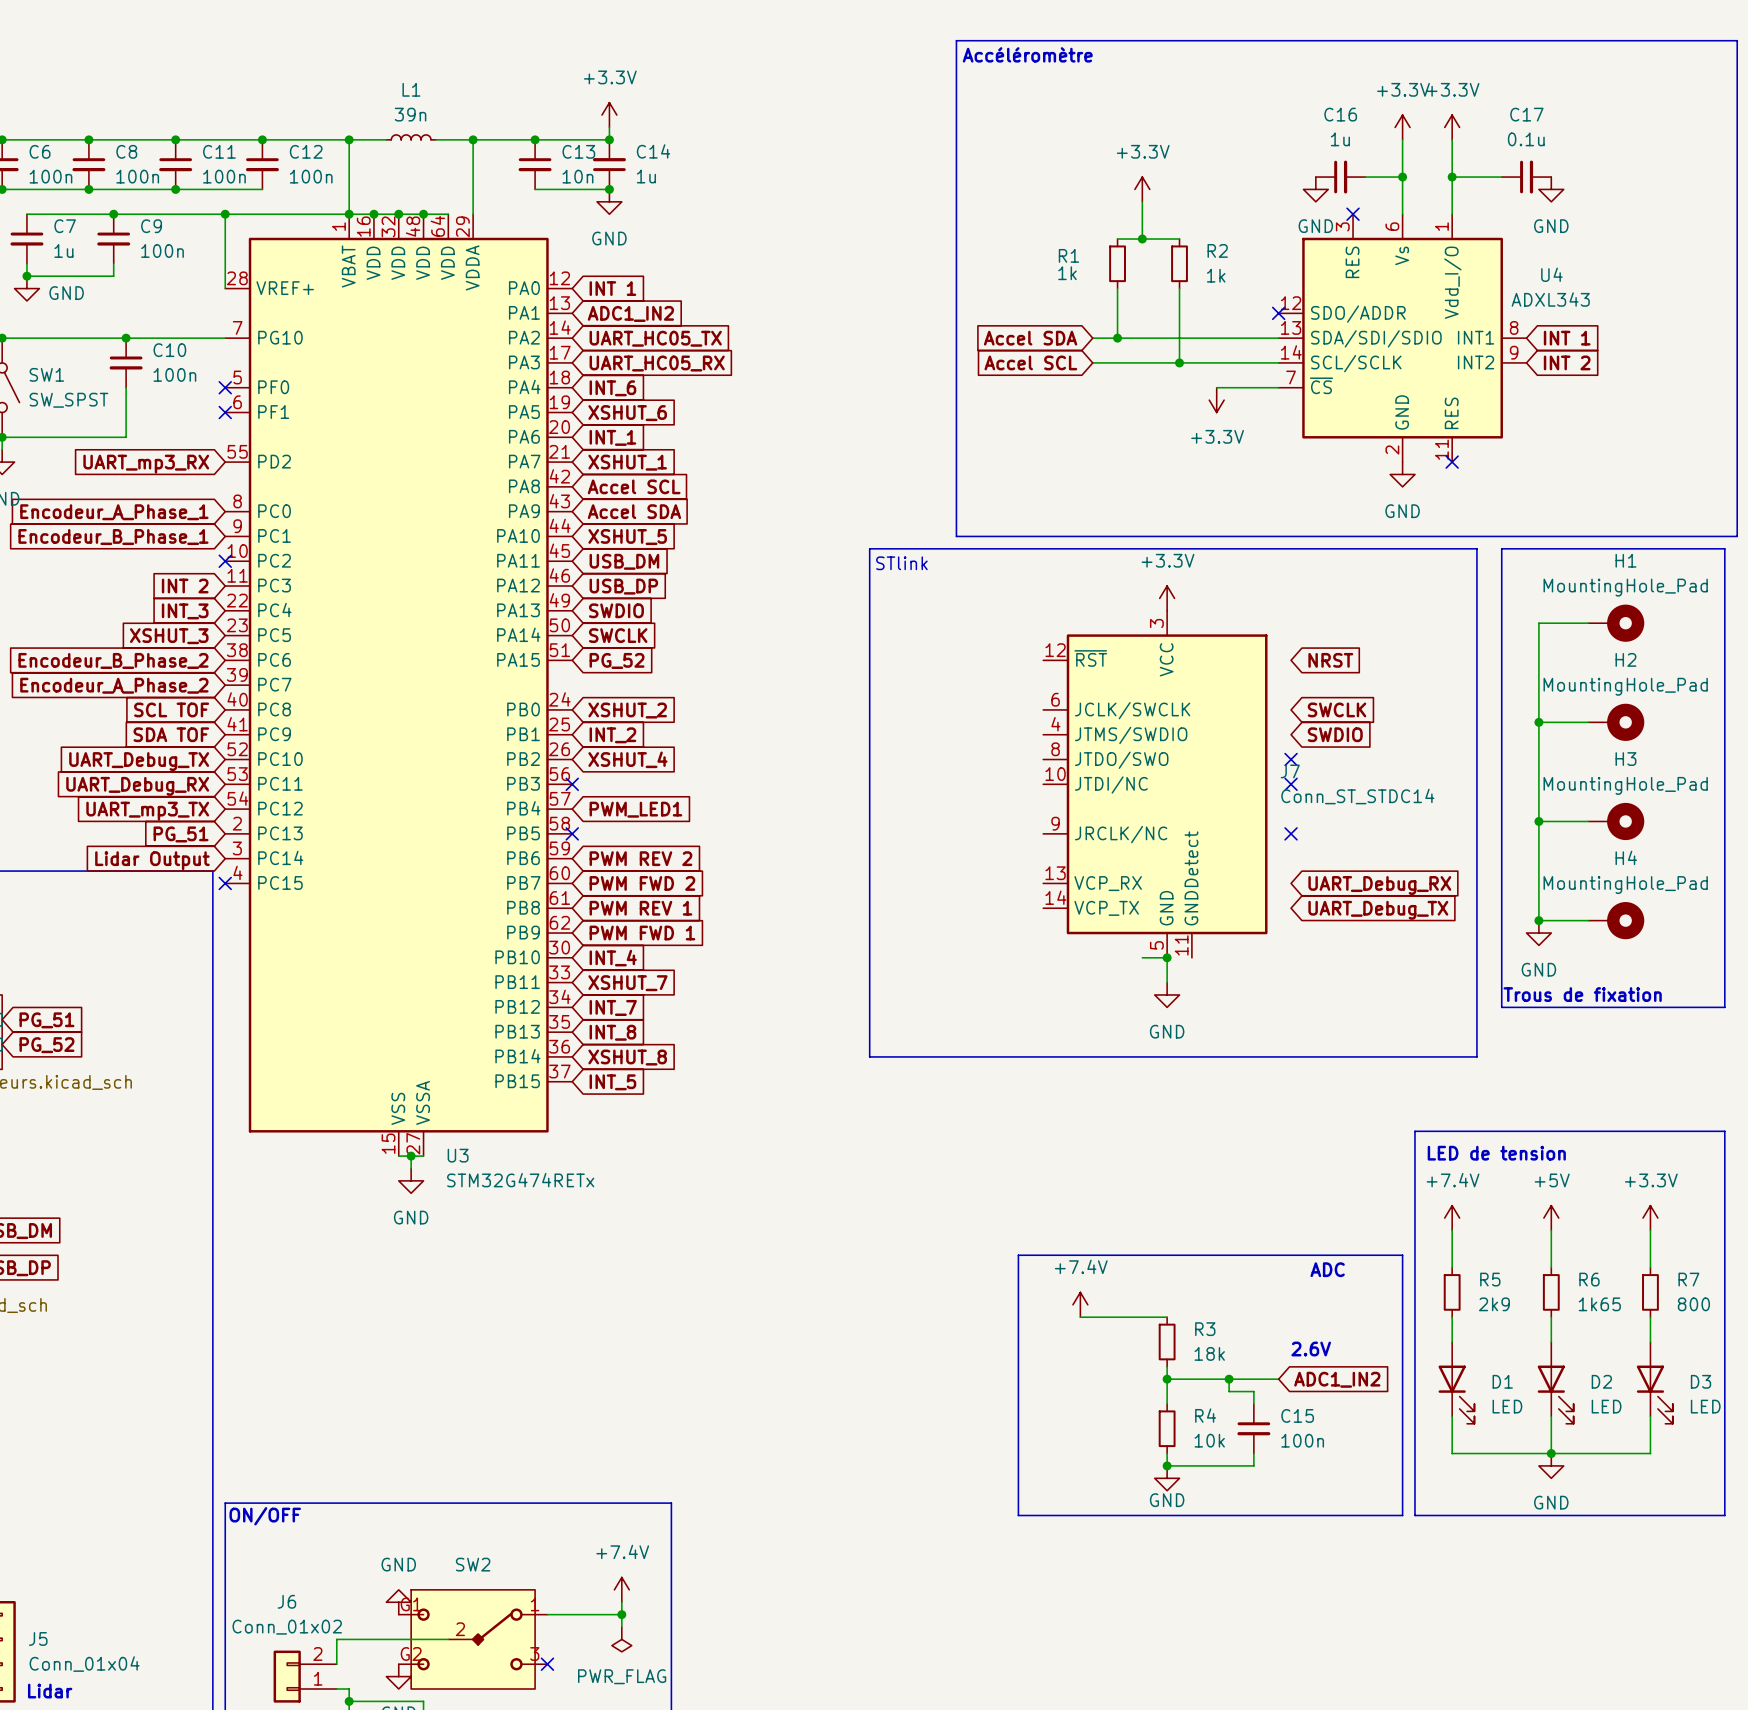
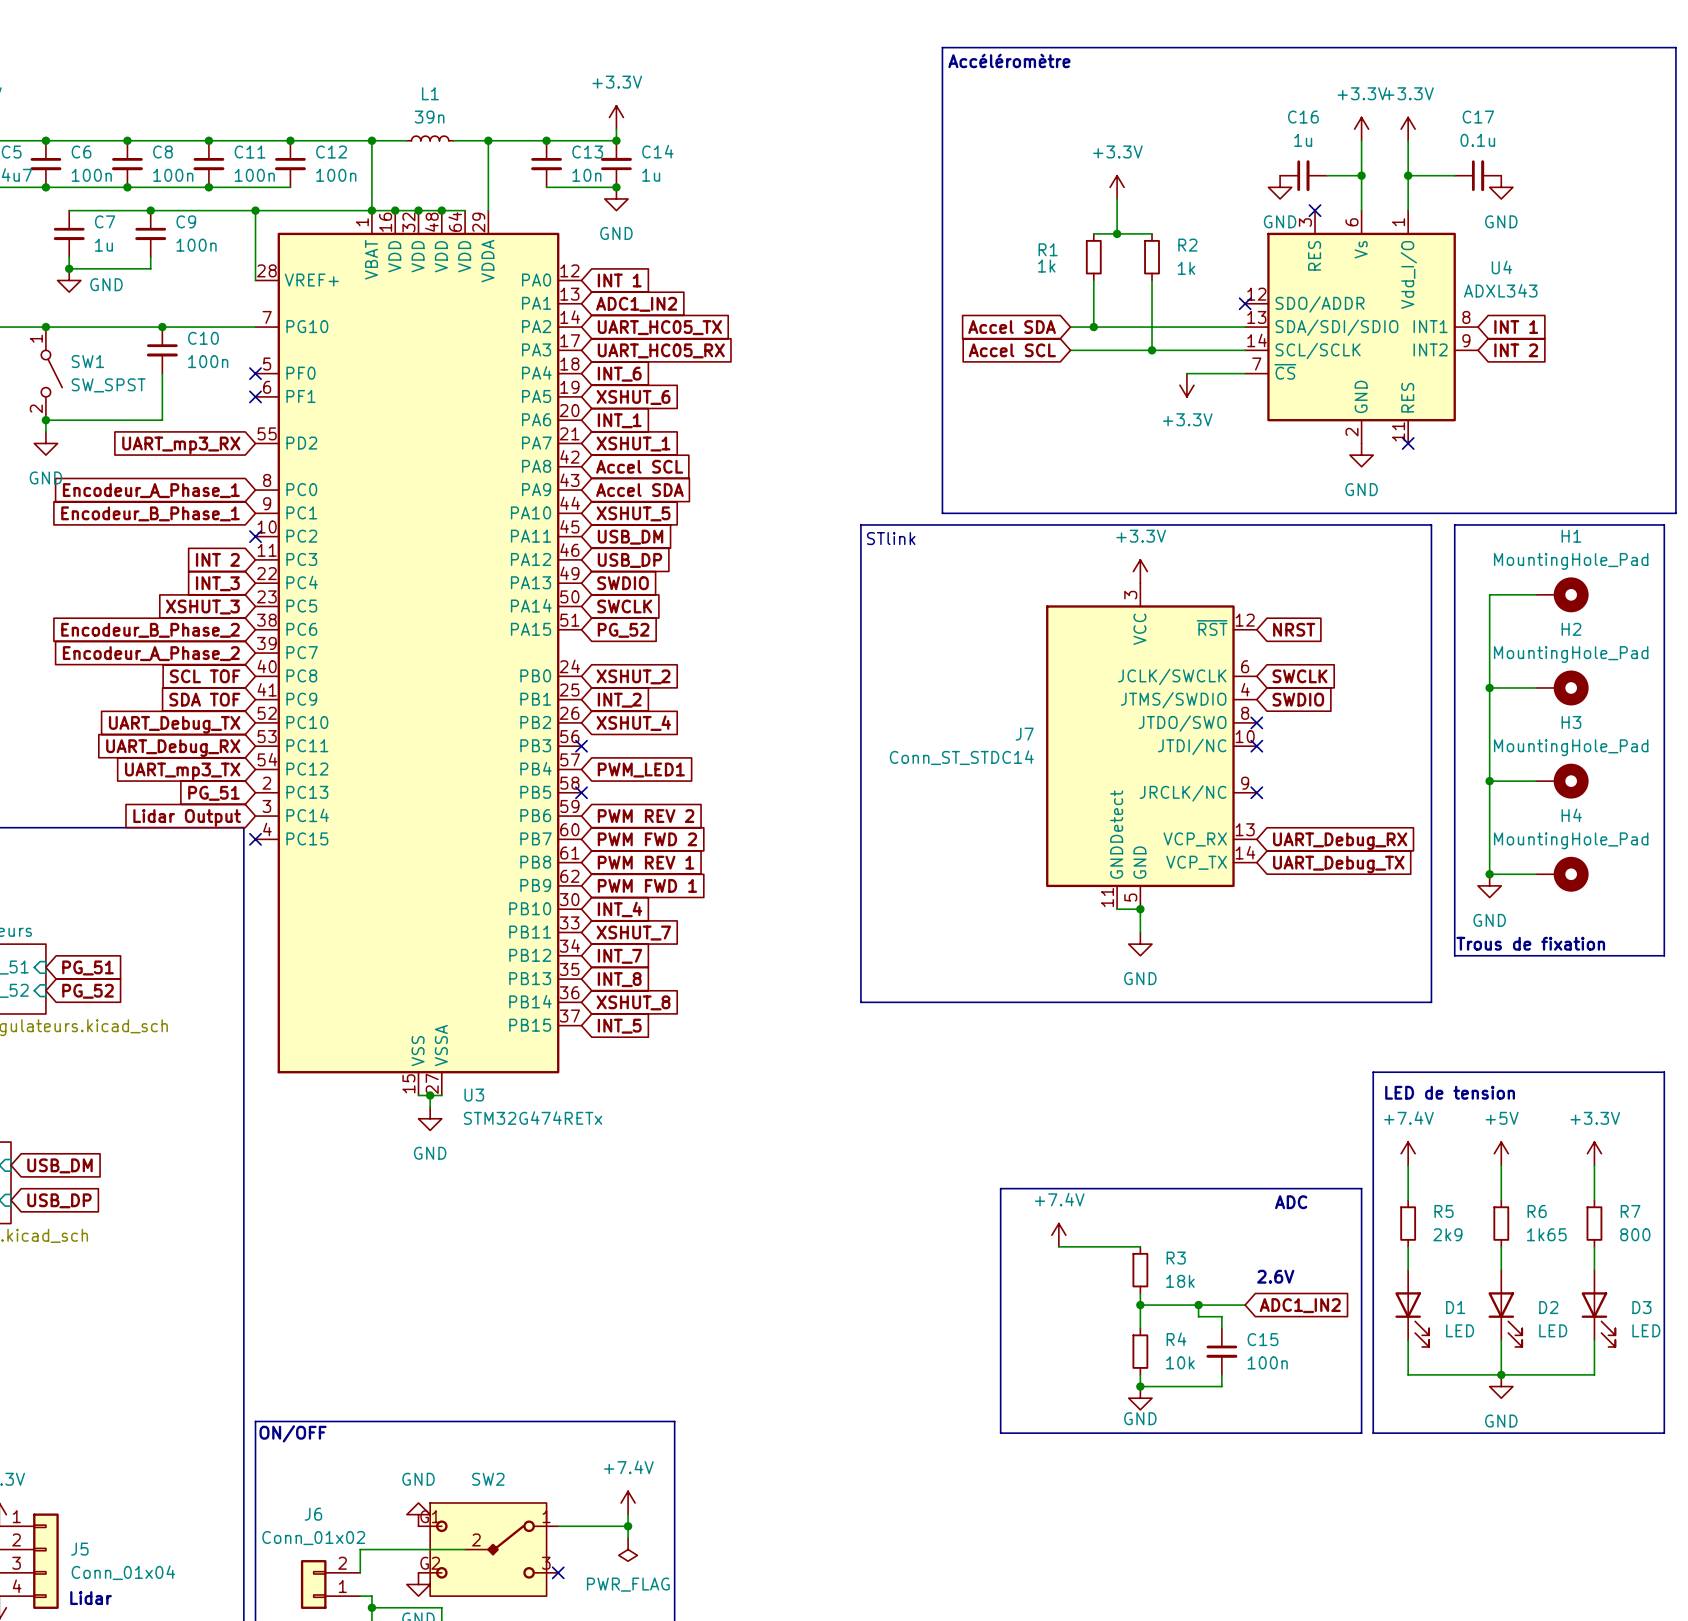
J7 flip: as is (1167, 784) -> left-right (1140, 746)

